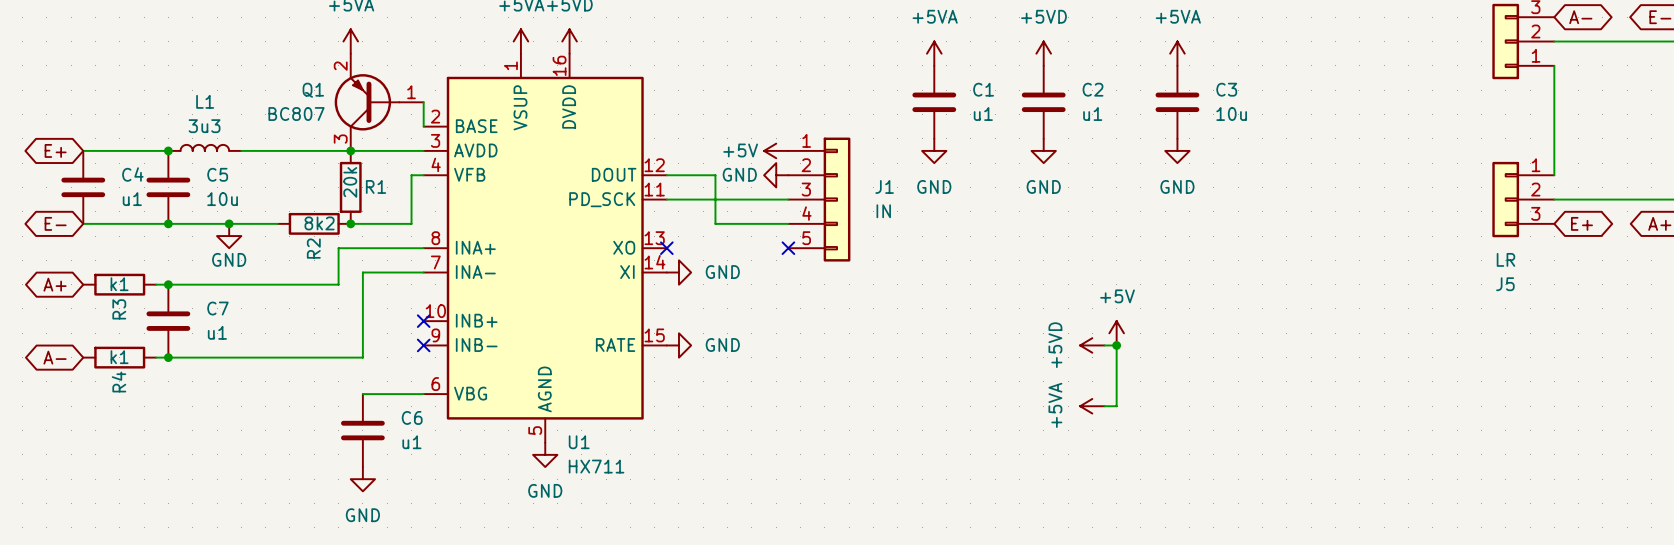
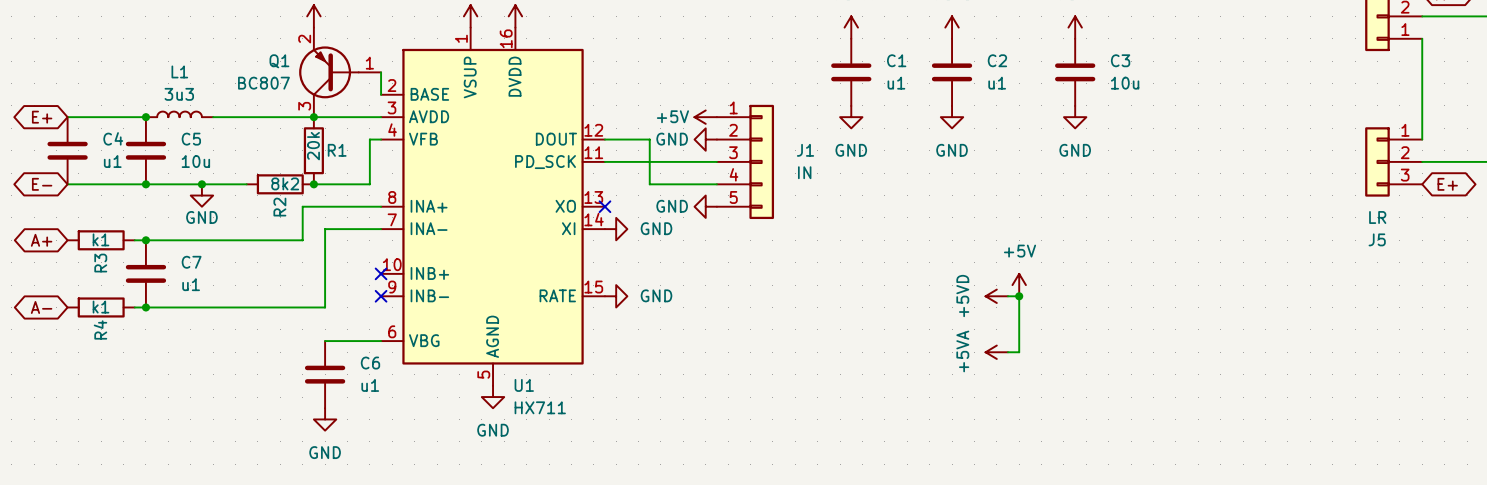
power symbol: none -> GND (705, 206)
no-connect mark: (788, 248) -> none

